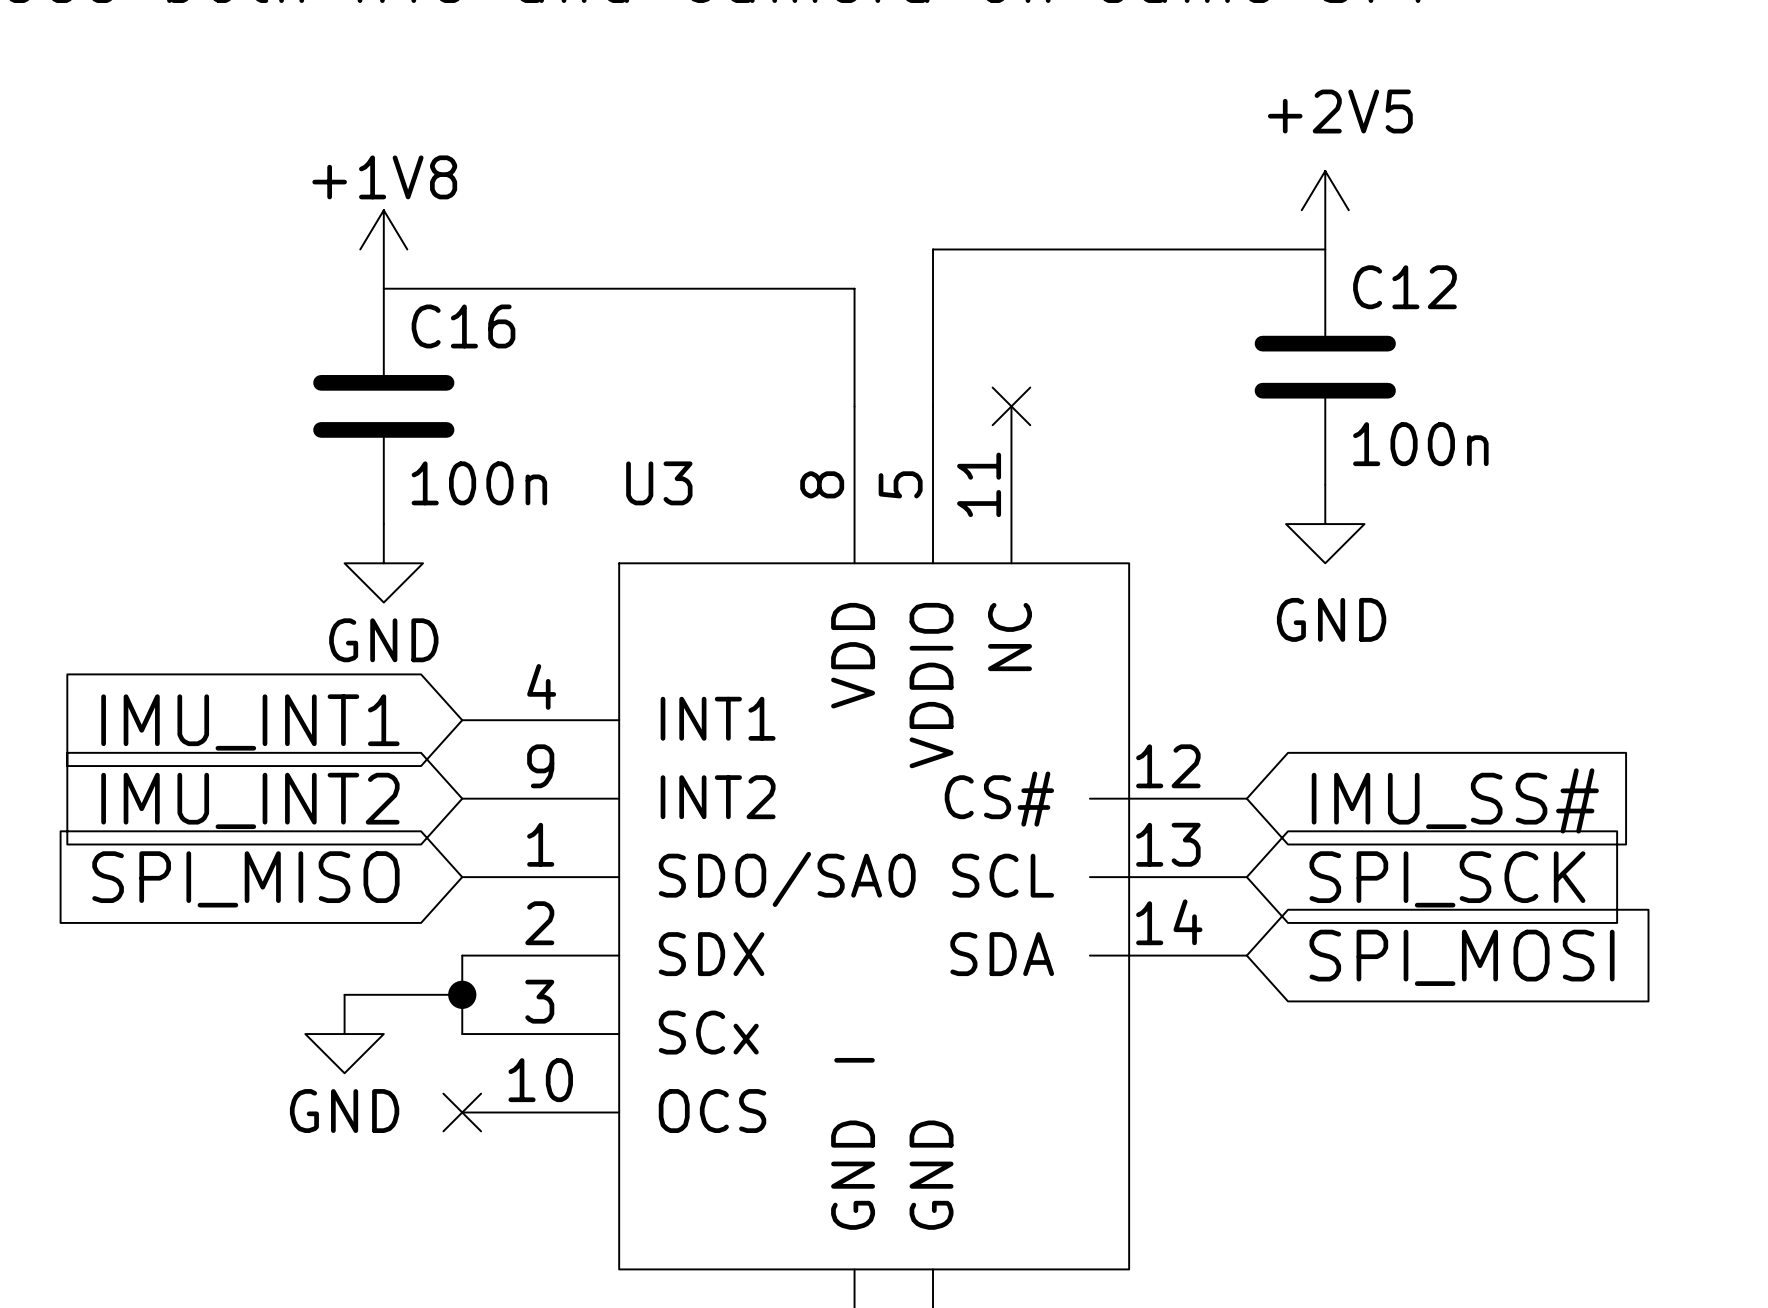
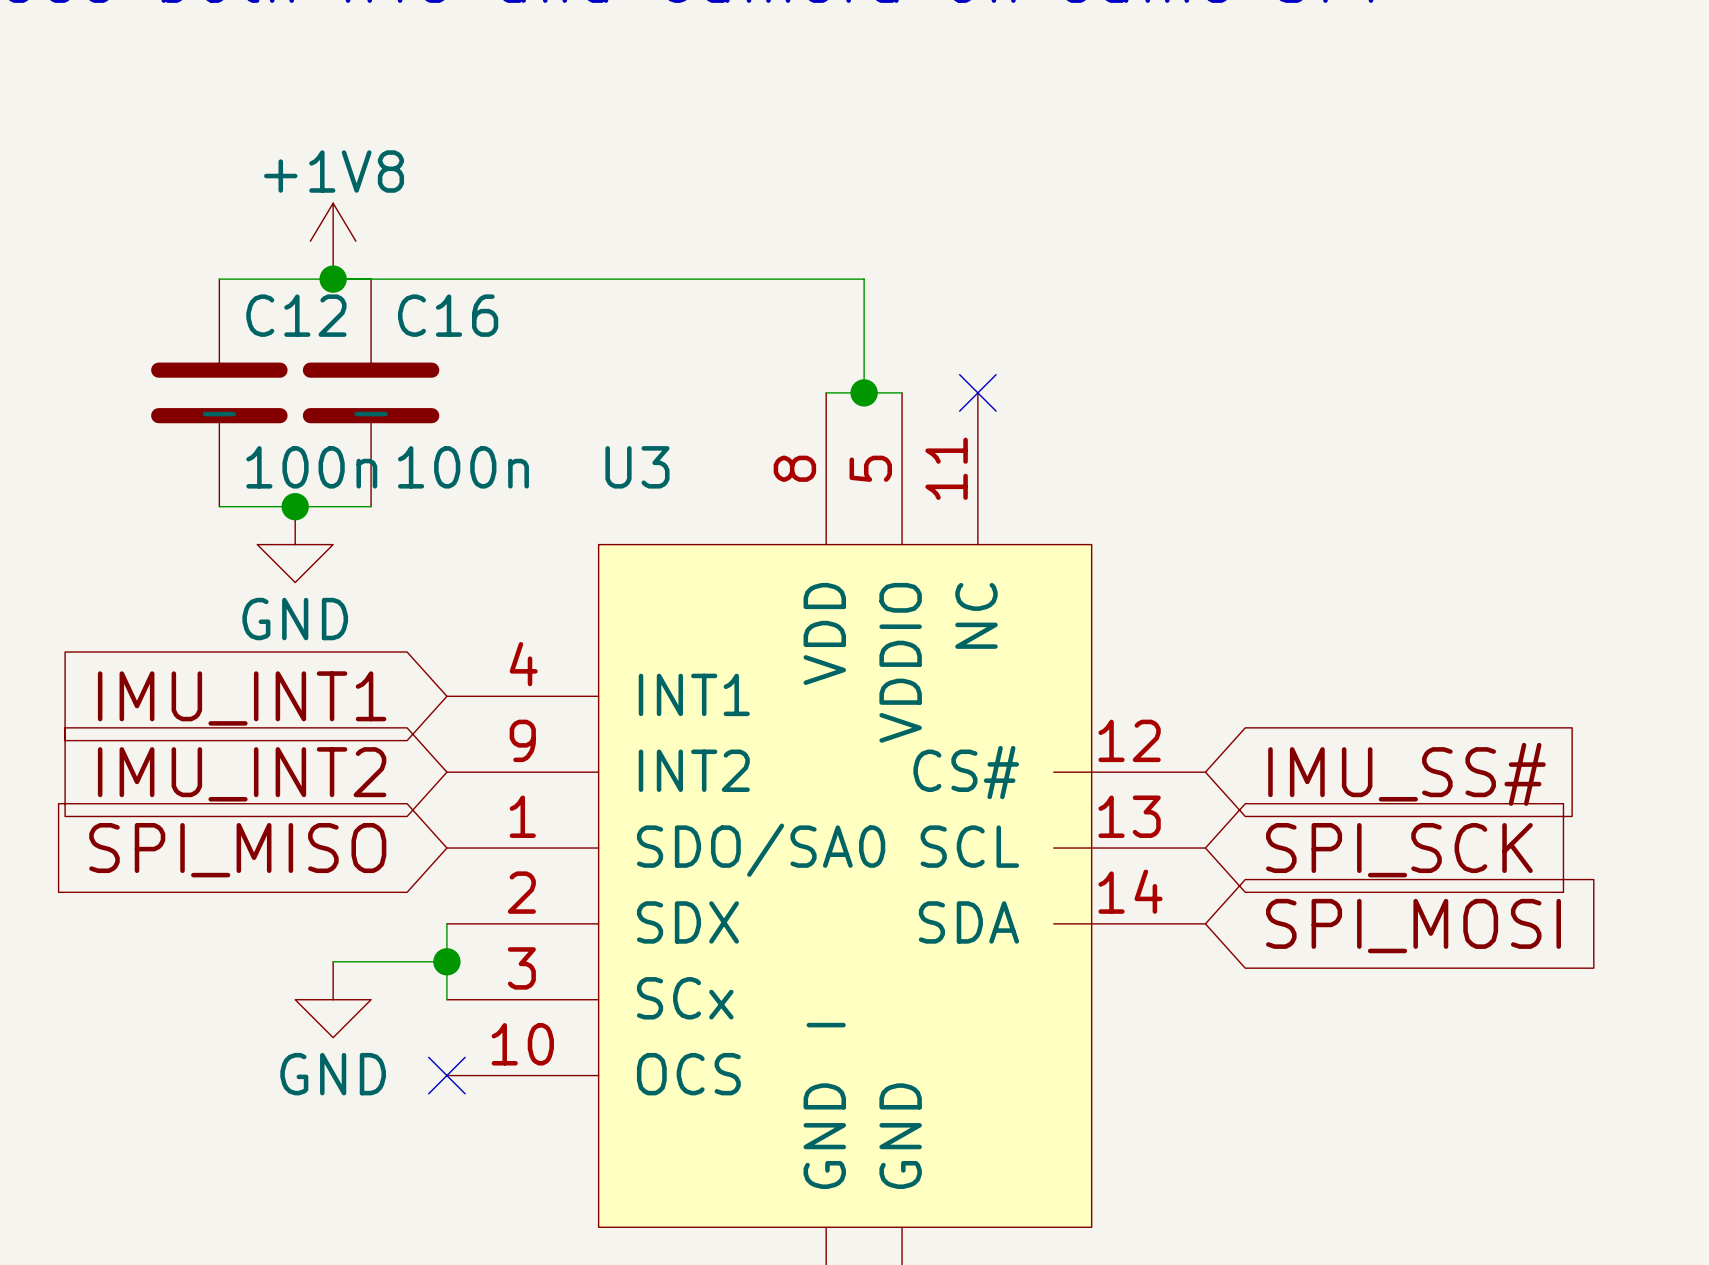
power symbol: +2V5 (1325, 210) -> none
power symbol position: +1V8 (383, 249) -> +1V8 (333, 241)
wire: (1325, 249) (933, 249) (933, 406) -> (826, 392) (902, 392)
wire: none -> (219, 279) (371, 279)
junction: none -> (333, 279)
wire: (854, 288) (854, 406) -> (826, 279) (864, 279) (864, 392)
C12 position: (1325, 367) -> (219, 392)
junction: none -> (864, 392)
wire: none -> (219, 506) (371, 506)
junction: none -> (295, 506)
power symbol: GND (1325, 524) -> none
power symbol position: GND (383, 563) -> GND (295, 544)

